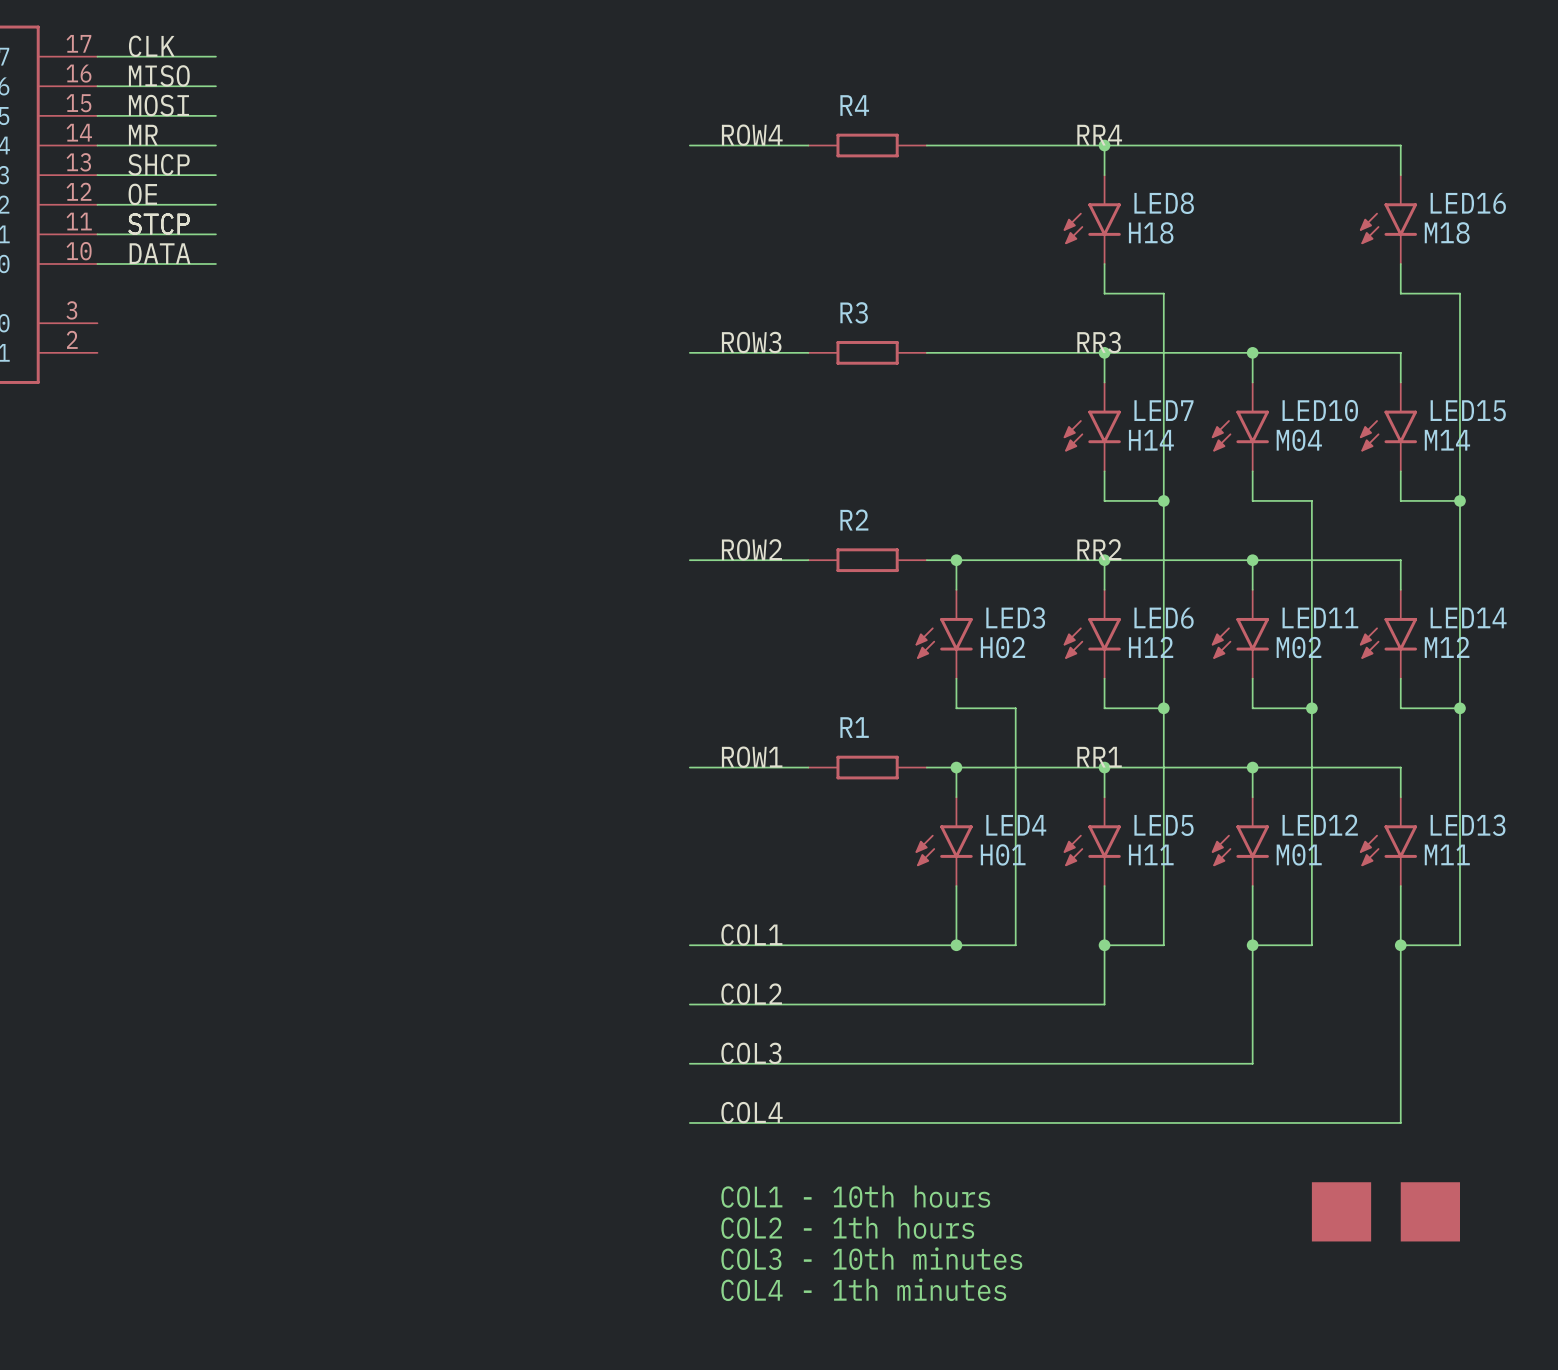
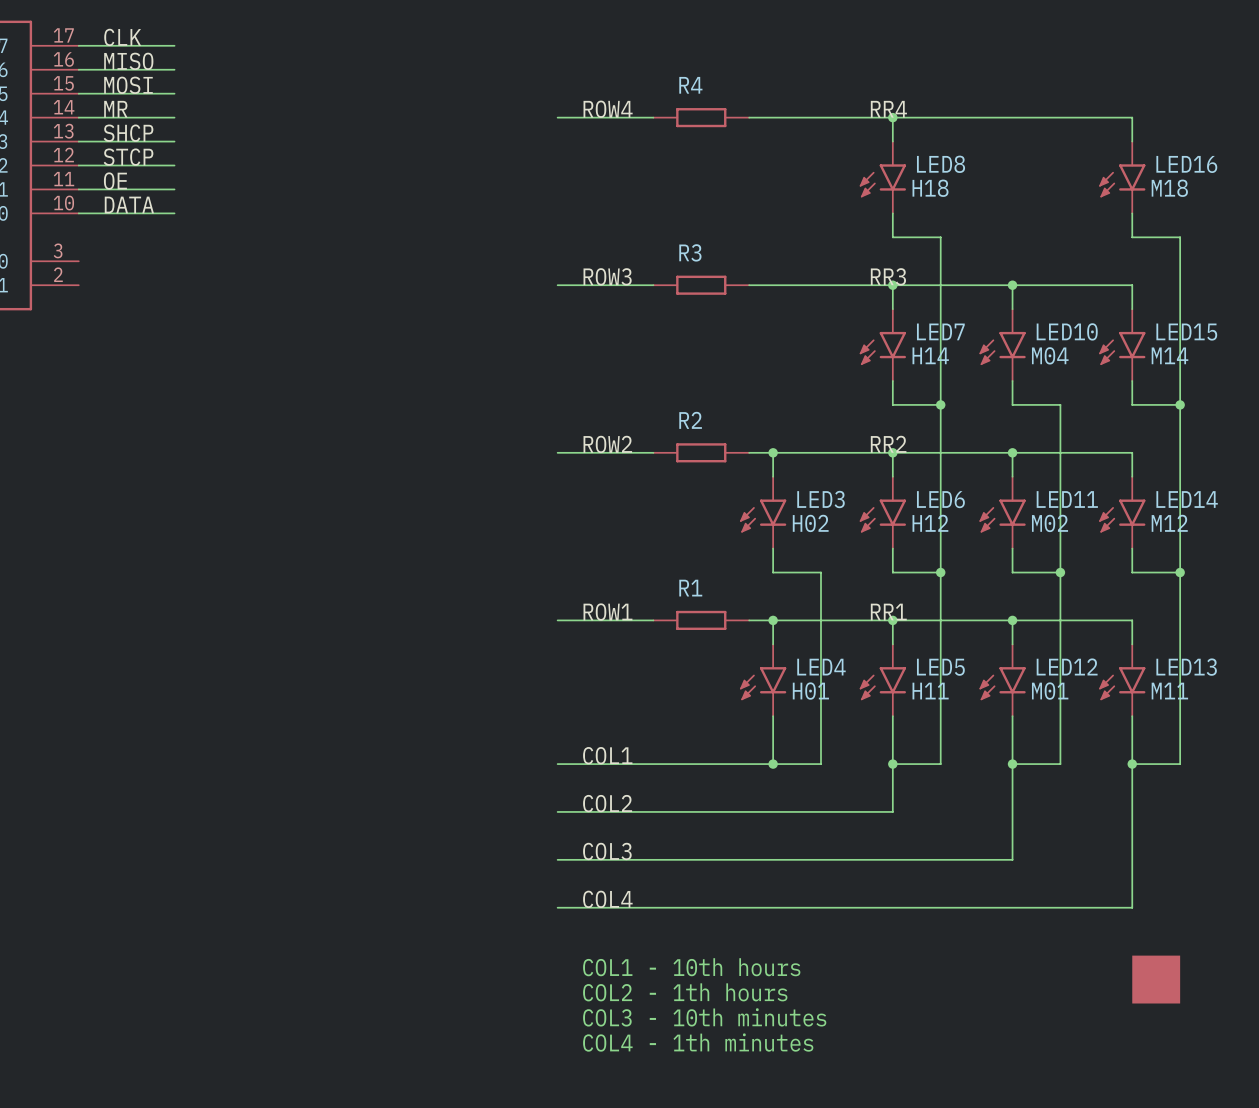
label: OE (142, 194) -> STCP (128, 157)
label: STCP (159, 224) -> OE (115, 181)
part: (1341, 1211) -> none

